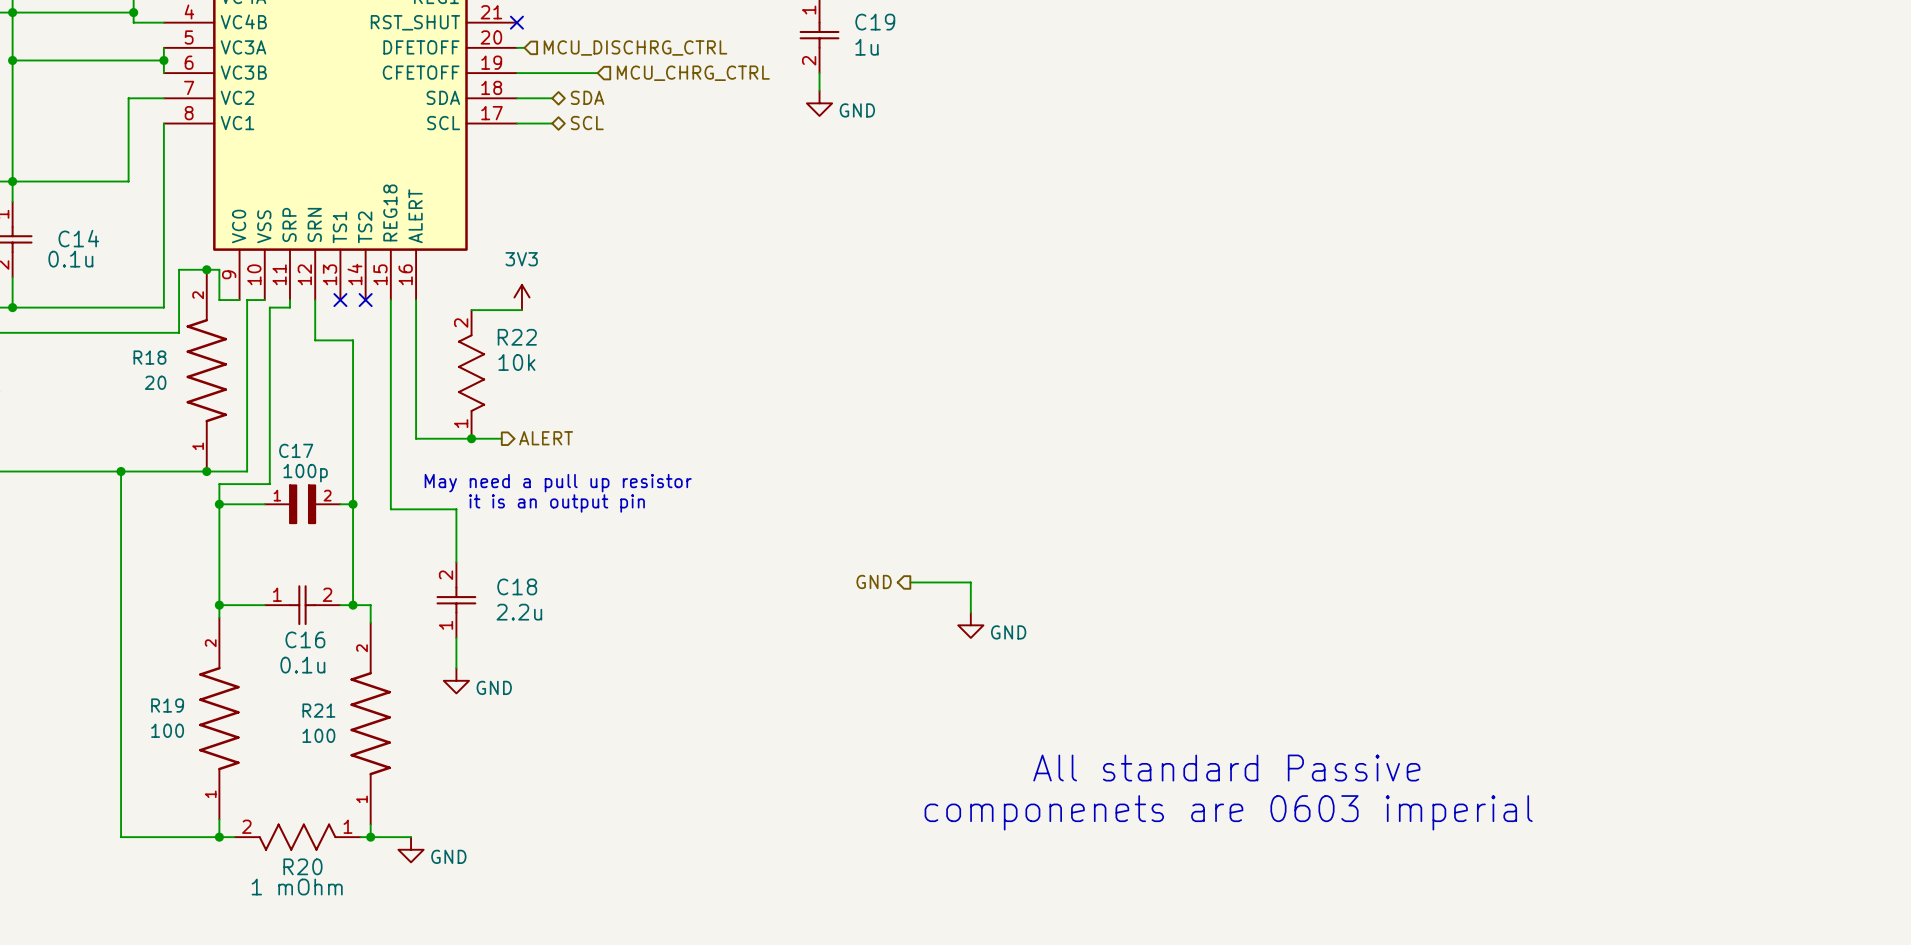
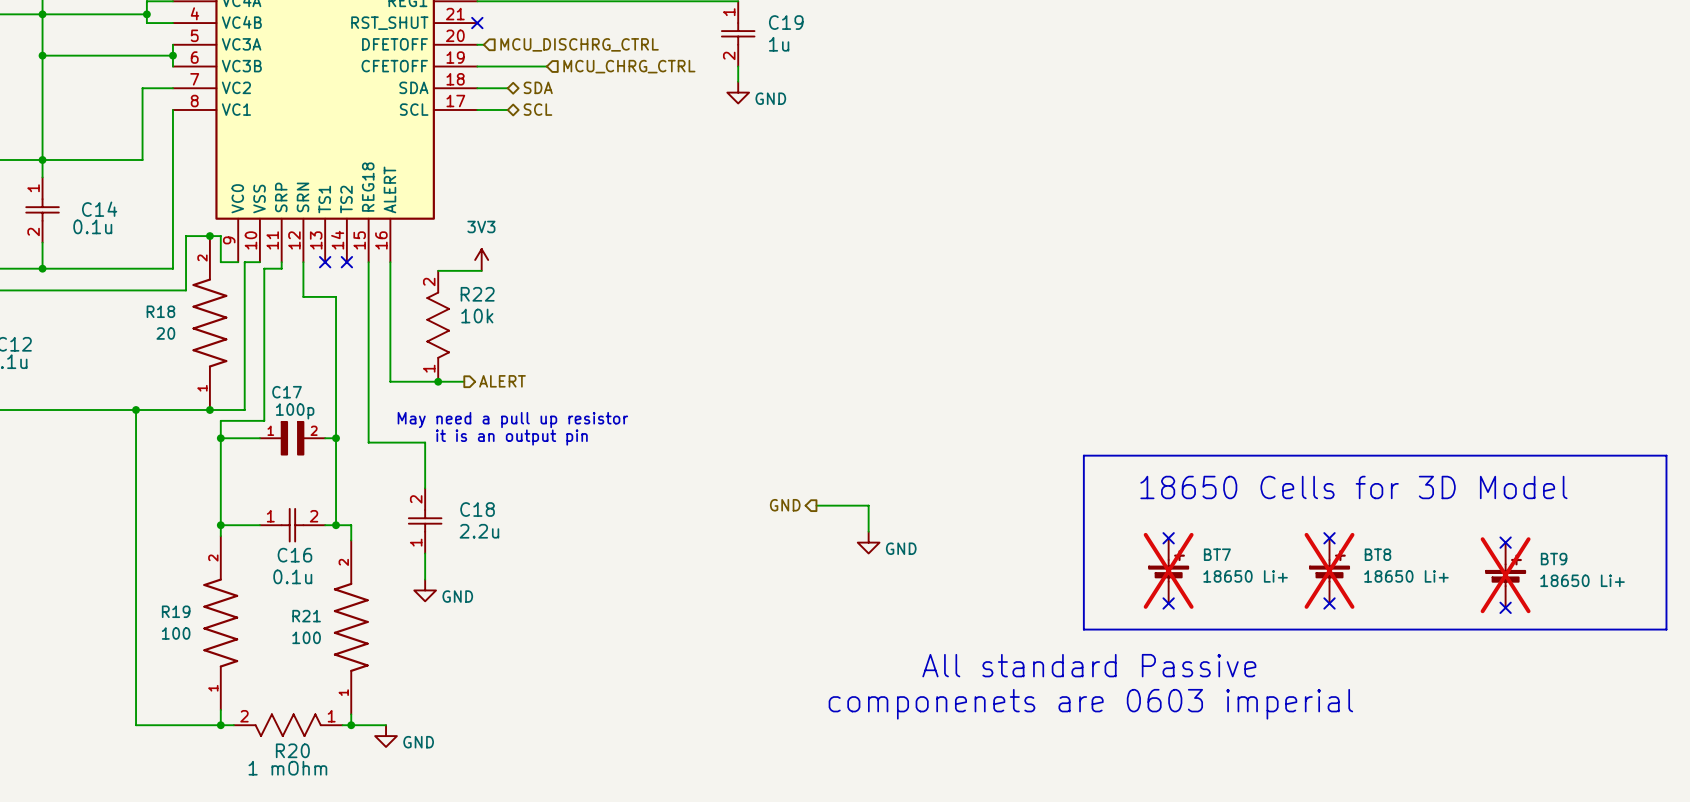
line: none -> (1083, 455) (1666, 455) (1666, 629) (1083, 629) (1083, 455)
text: none -> 18650 Cells for 3D Model (1353, 487)
no-connect mark: none -> (1168, 538)
no-connect mark: none -> (1329, 538)
no-connect mark: none -> (1505, 542)
BT7: none -> 18650 Li+ (1168, 570)
BT8: none -> 18650 Li+ (1329, 570)
BT9: none -> 18650 Li+ (1505, 575)
no-connect mark: none -> (1168, 603)
no-connect mark: none -> (1329, 603)
no-connect mark: none -> (1505, 607)

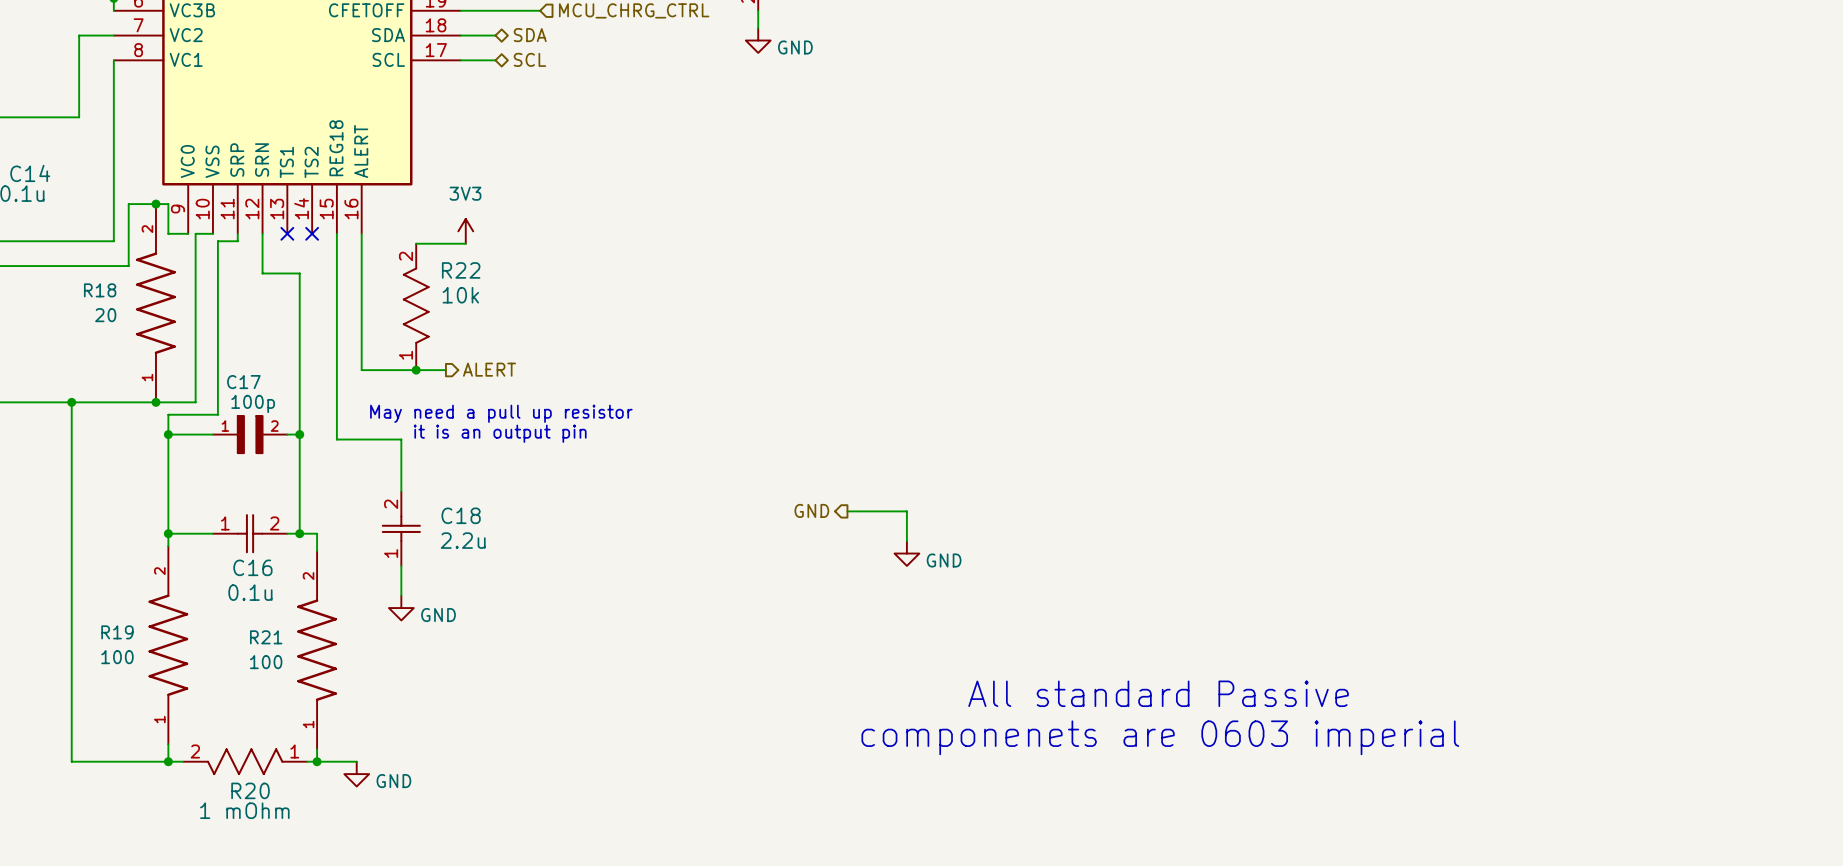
line: (1083, 455) (1666, 455) (1666, 629) (1083, 629) (1083, 455) -> none
text: 18650 Cells for 3D Model (1353, 487) -> none
no-connect mark: (1168, 538) -> none
no-connect mark: (1329, 538) -> none
no-connect mark: (1505, 542) -> none
BT7: 18650 Li+ (1168, 570) -> none
BT8: 18650 Li+ (1329, 570) -> none
BT9: 18650 Li+ (1505, 575) -> none
no-connect mark: (1168, 603) -> none
no-connect mark: (1329, 603) -> none
no-connect mark: (1505, 607) -> none

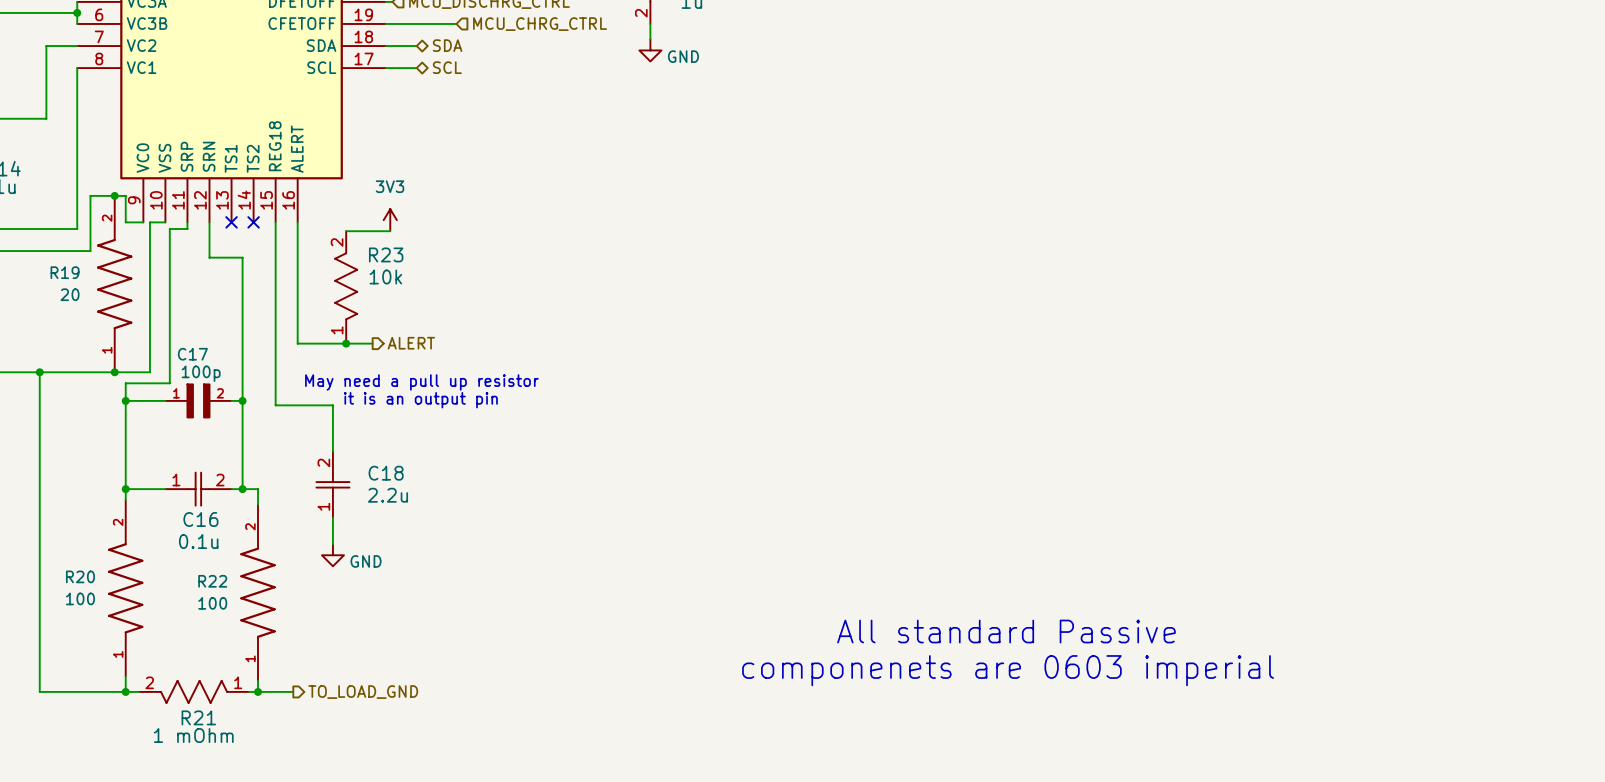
R22 name: R22 (461, 270) -> R23 (386, 254)
R18 name: R18 (100, 290) -> R19 (65, 272)
hierarchical label: GND (811, 510) -> none
wire: (847, 511) (906, 511) (906, 541) -> none
power symbol: GND (906, 553) -> none
R19 name: R19 (117, 632) -> R20 (80, 576)
R21 name: R21 (266, 637) -> R22 (212, 581)
hierarchical label: none -> TO_LOAD_GND (363, 692)
power symbol: GND (356, 774) -> none
R20 name: R20 (250, 790) -> R21 (198, 717)

